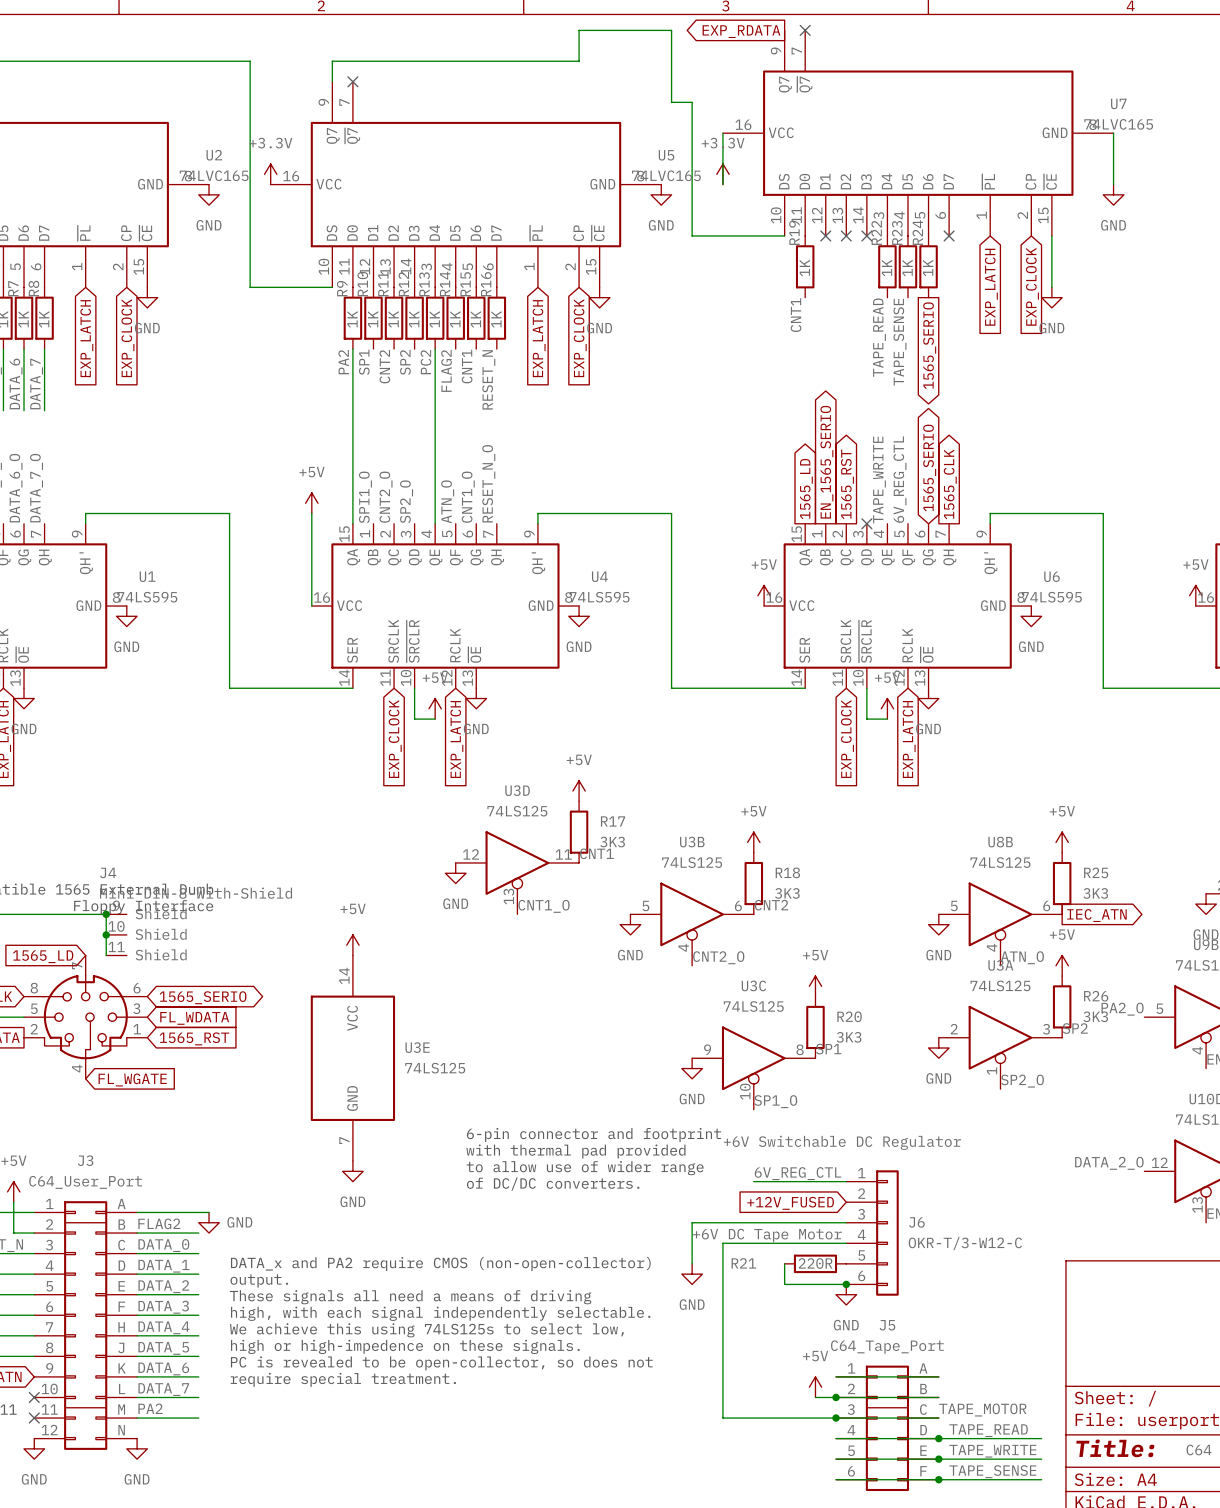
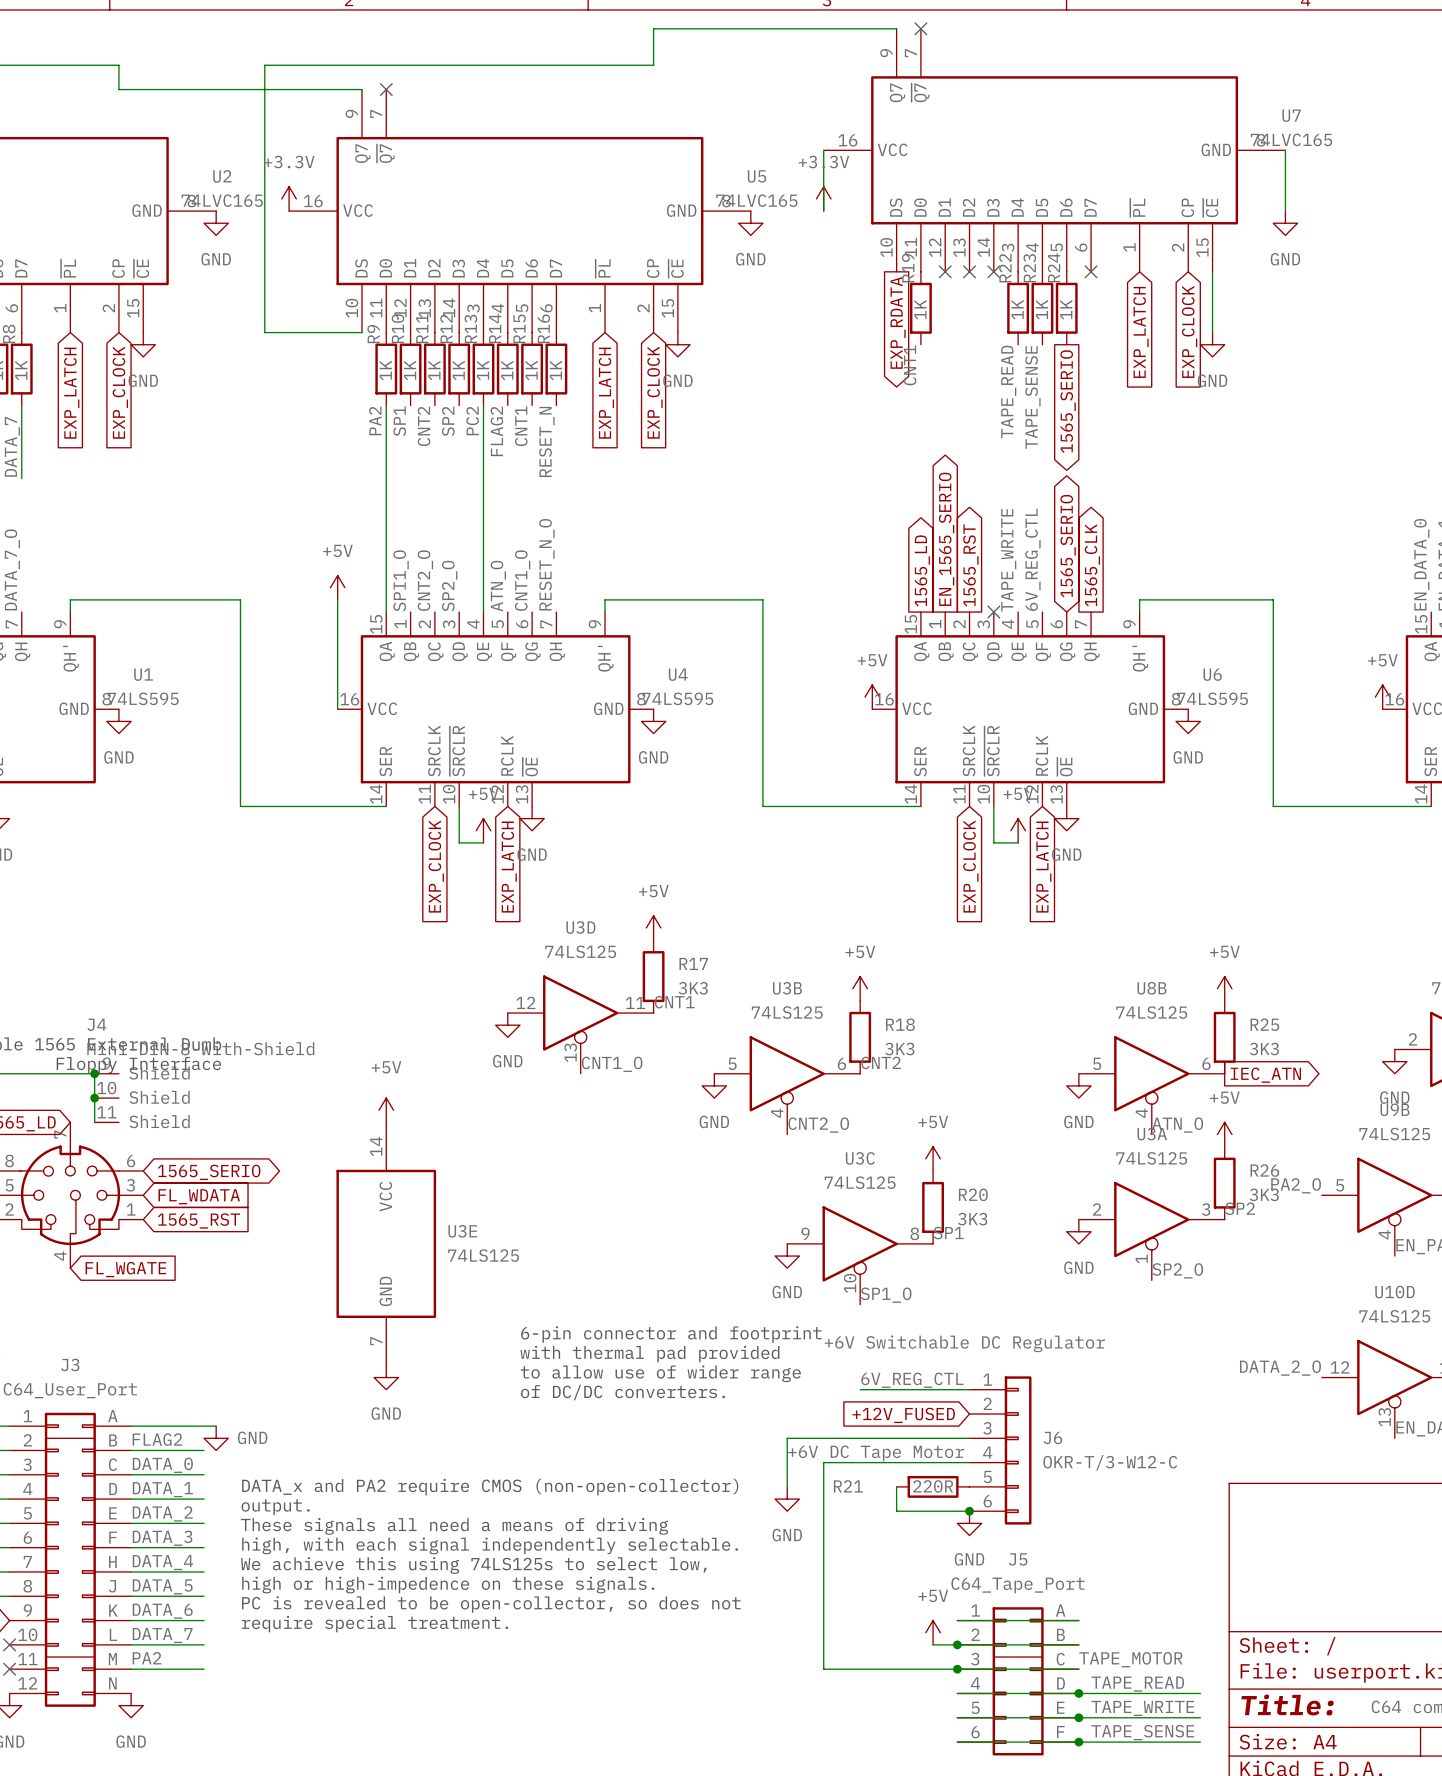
wire: (671, 30) (671, 102) (692, 102) (692, 235) (784, 235) -> (762, 28) (896, 28)
global label: EXP_RDATA (741, 31) -> none
wire: (126, 61) (250, 61) -> (118, 65) (118, 89) (361, 89)
wire: (332, 61) (332, 81) -> (361, 65) (264, 65)
global label: none -> EXP_RDATA (898, 322)

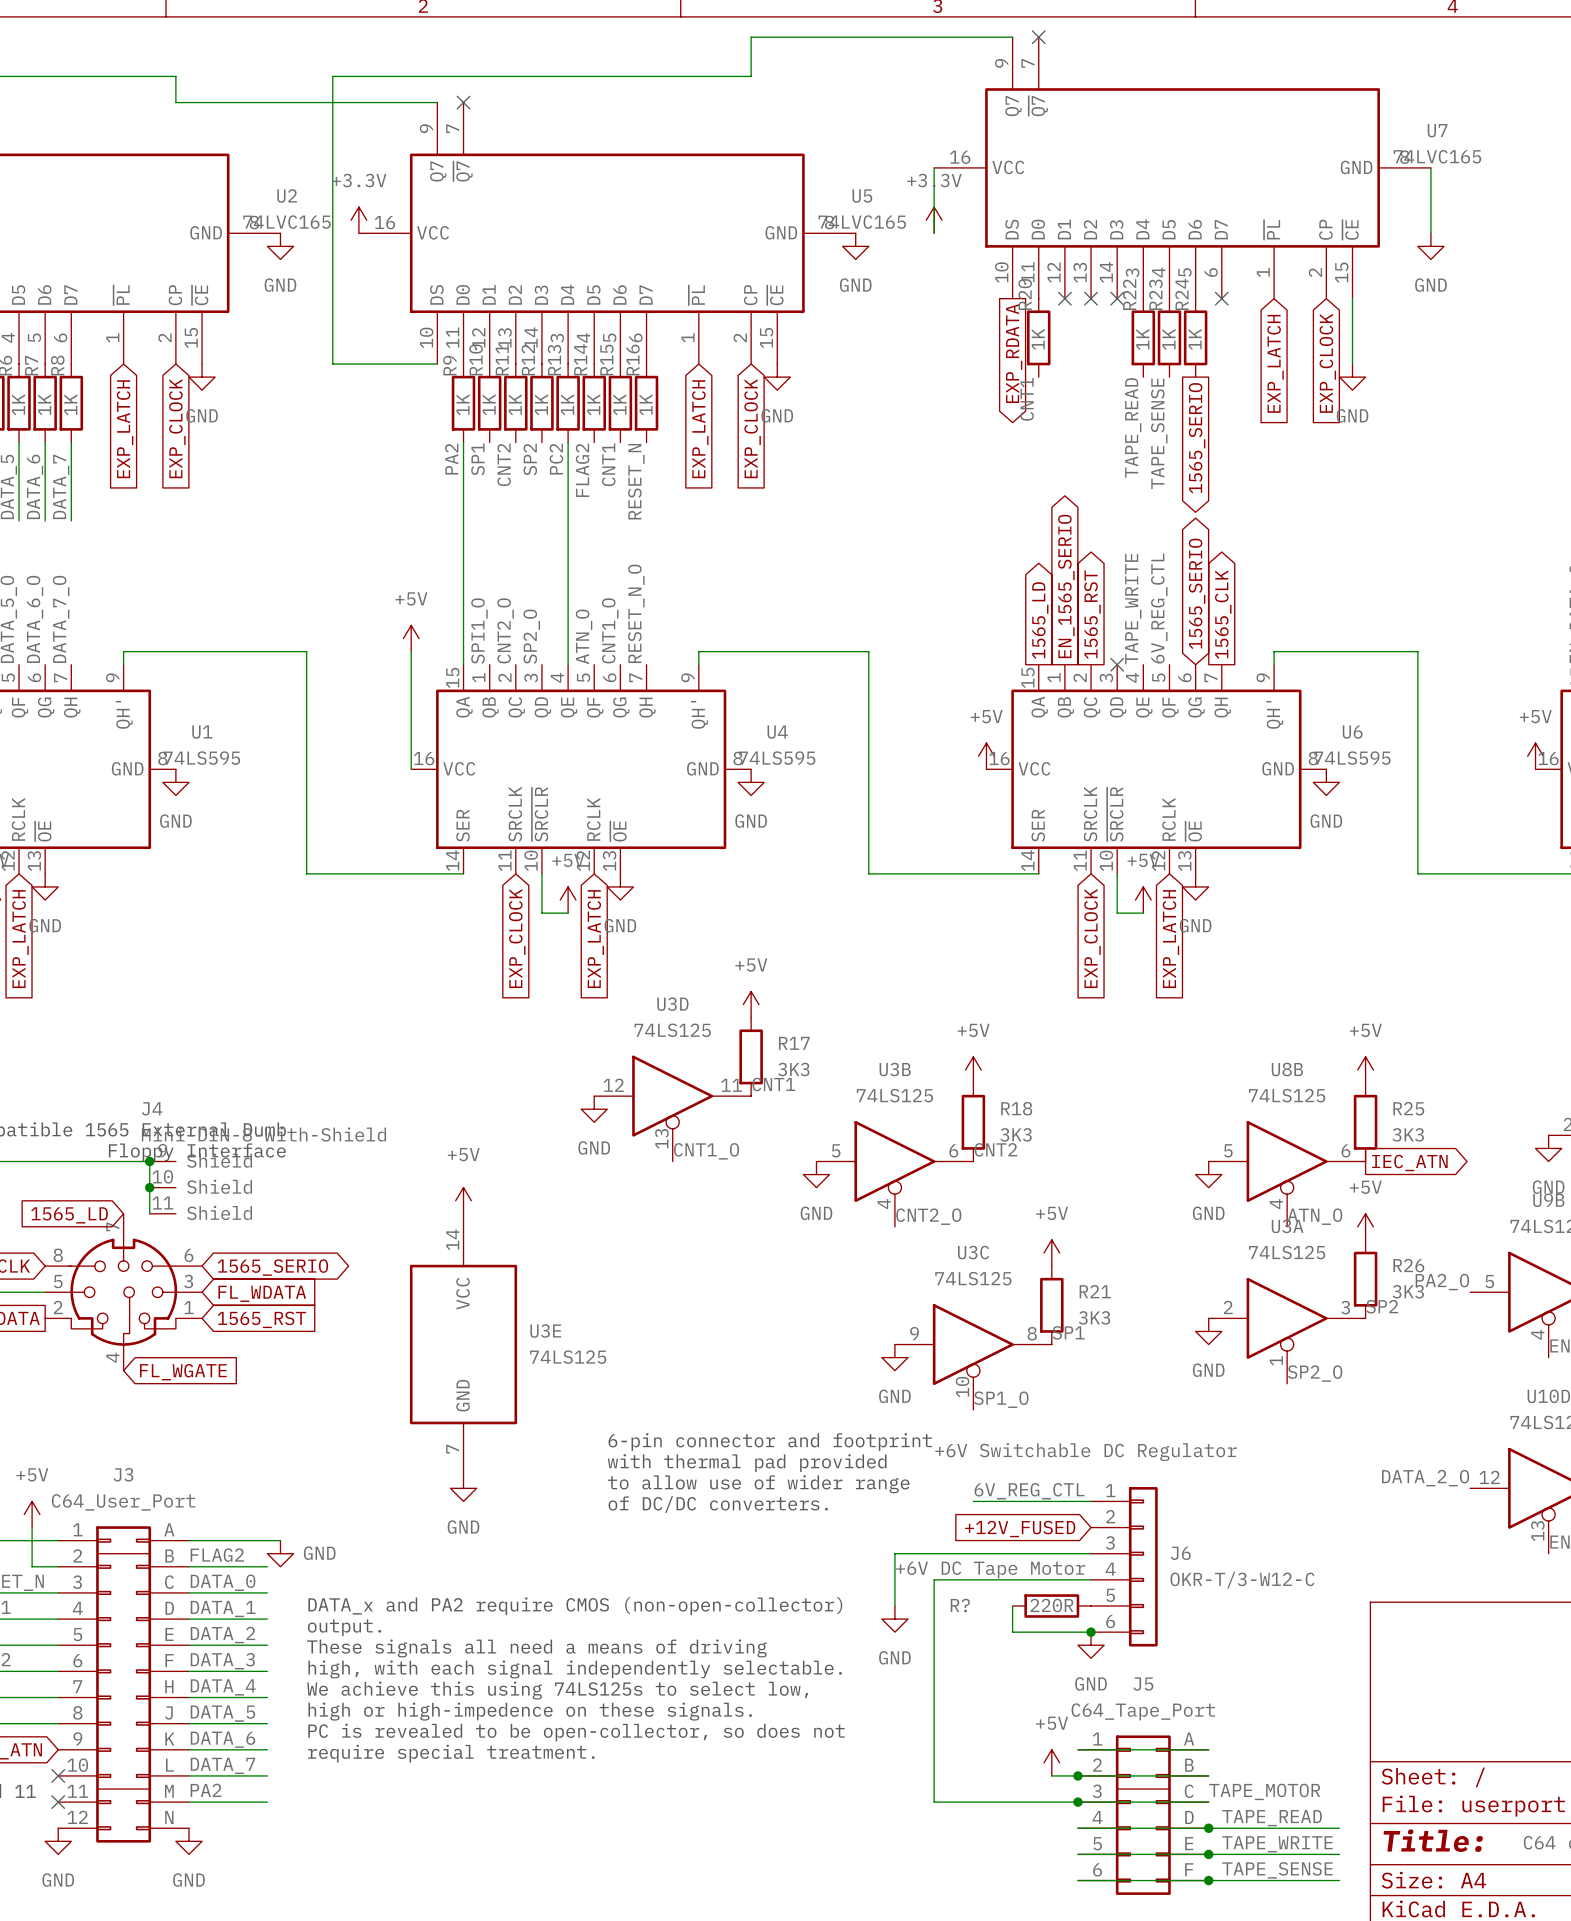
R19 name: R19 (908, 268) -> R20 (1025, 294)
R20 name: R20 (973, 1194) -> R21 (1095, 1291)
R21 name: R21 (848, 1486) -> R? (960, 1605)

